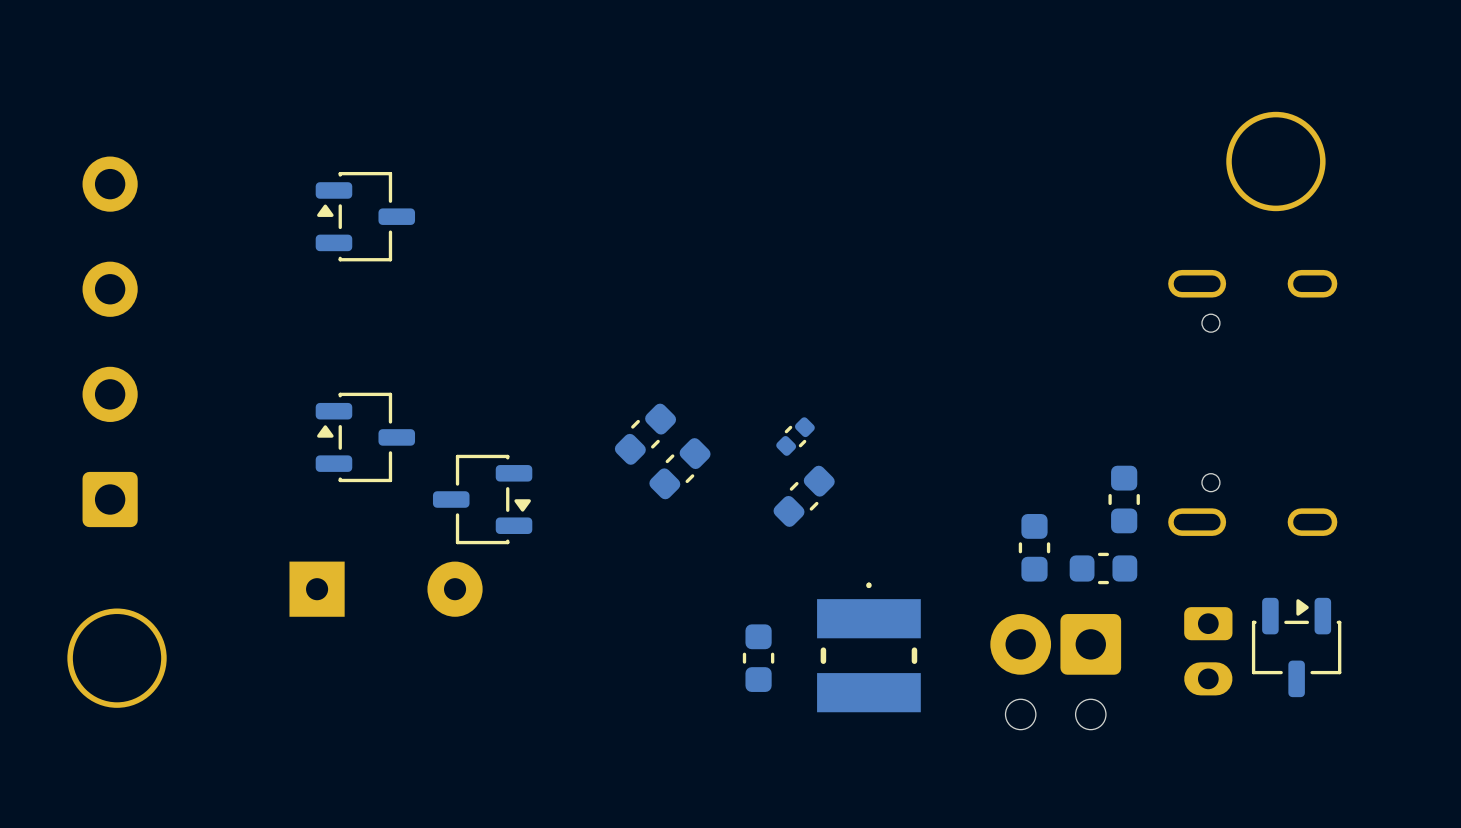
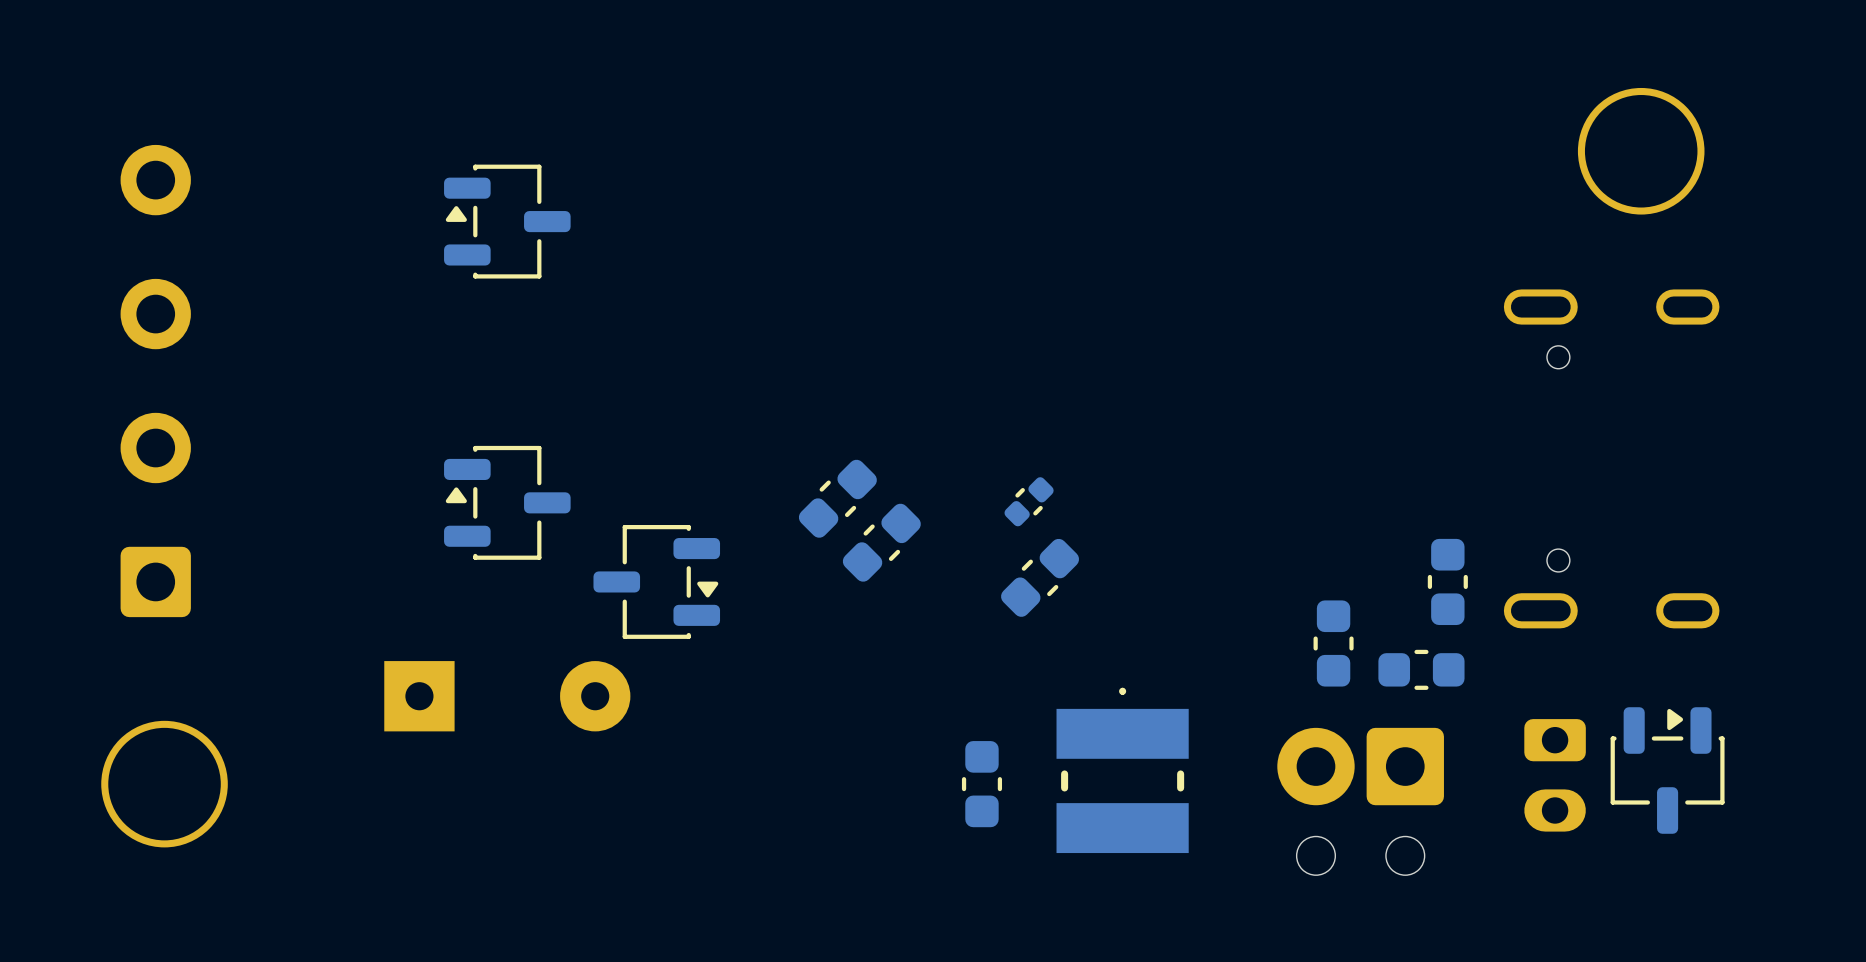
part position: (365, 216) -> (507, 221)
part position: (365, 437) -> (507, 502)
part position: (482, 499) -> (656, 581)

